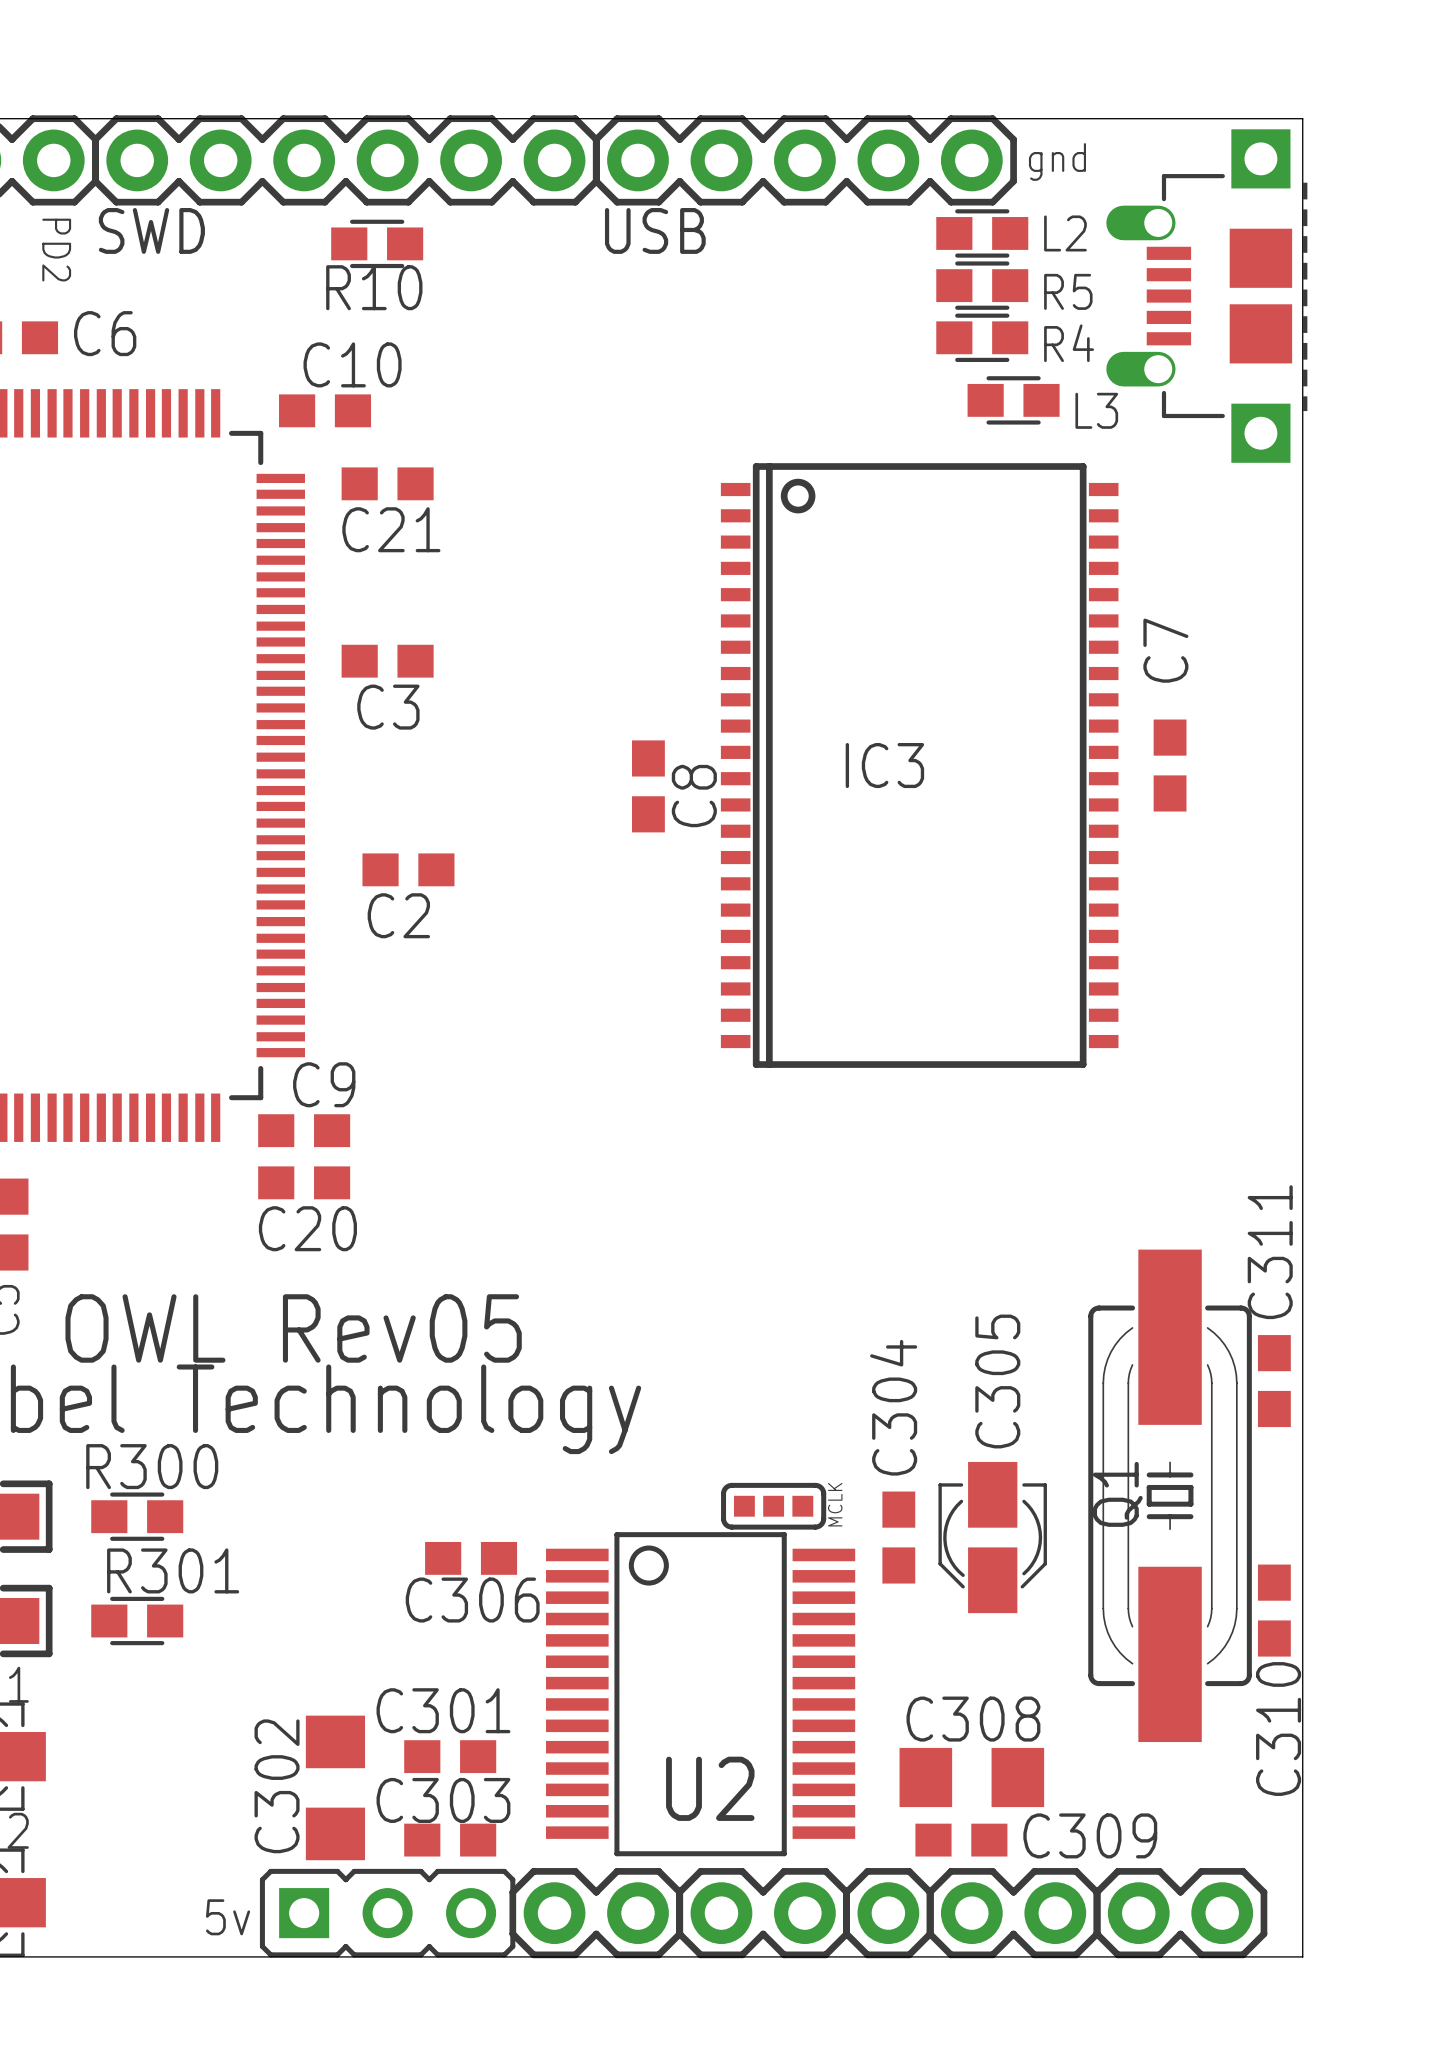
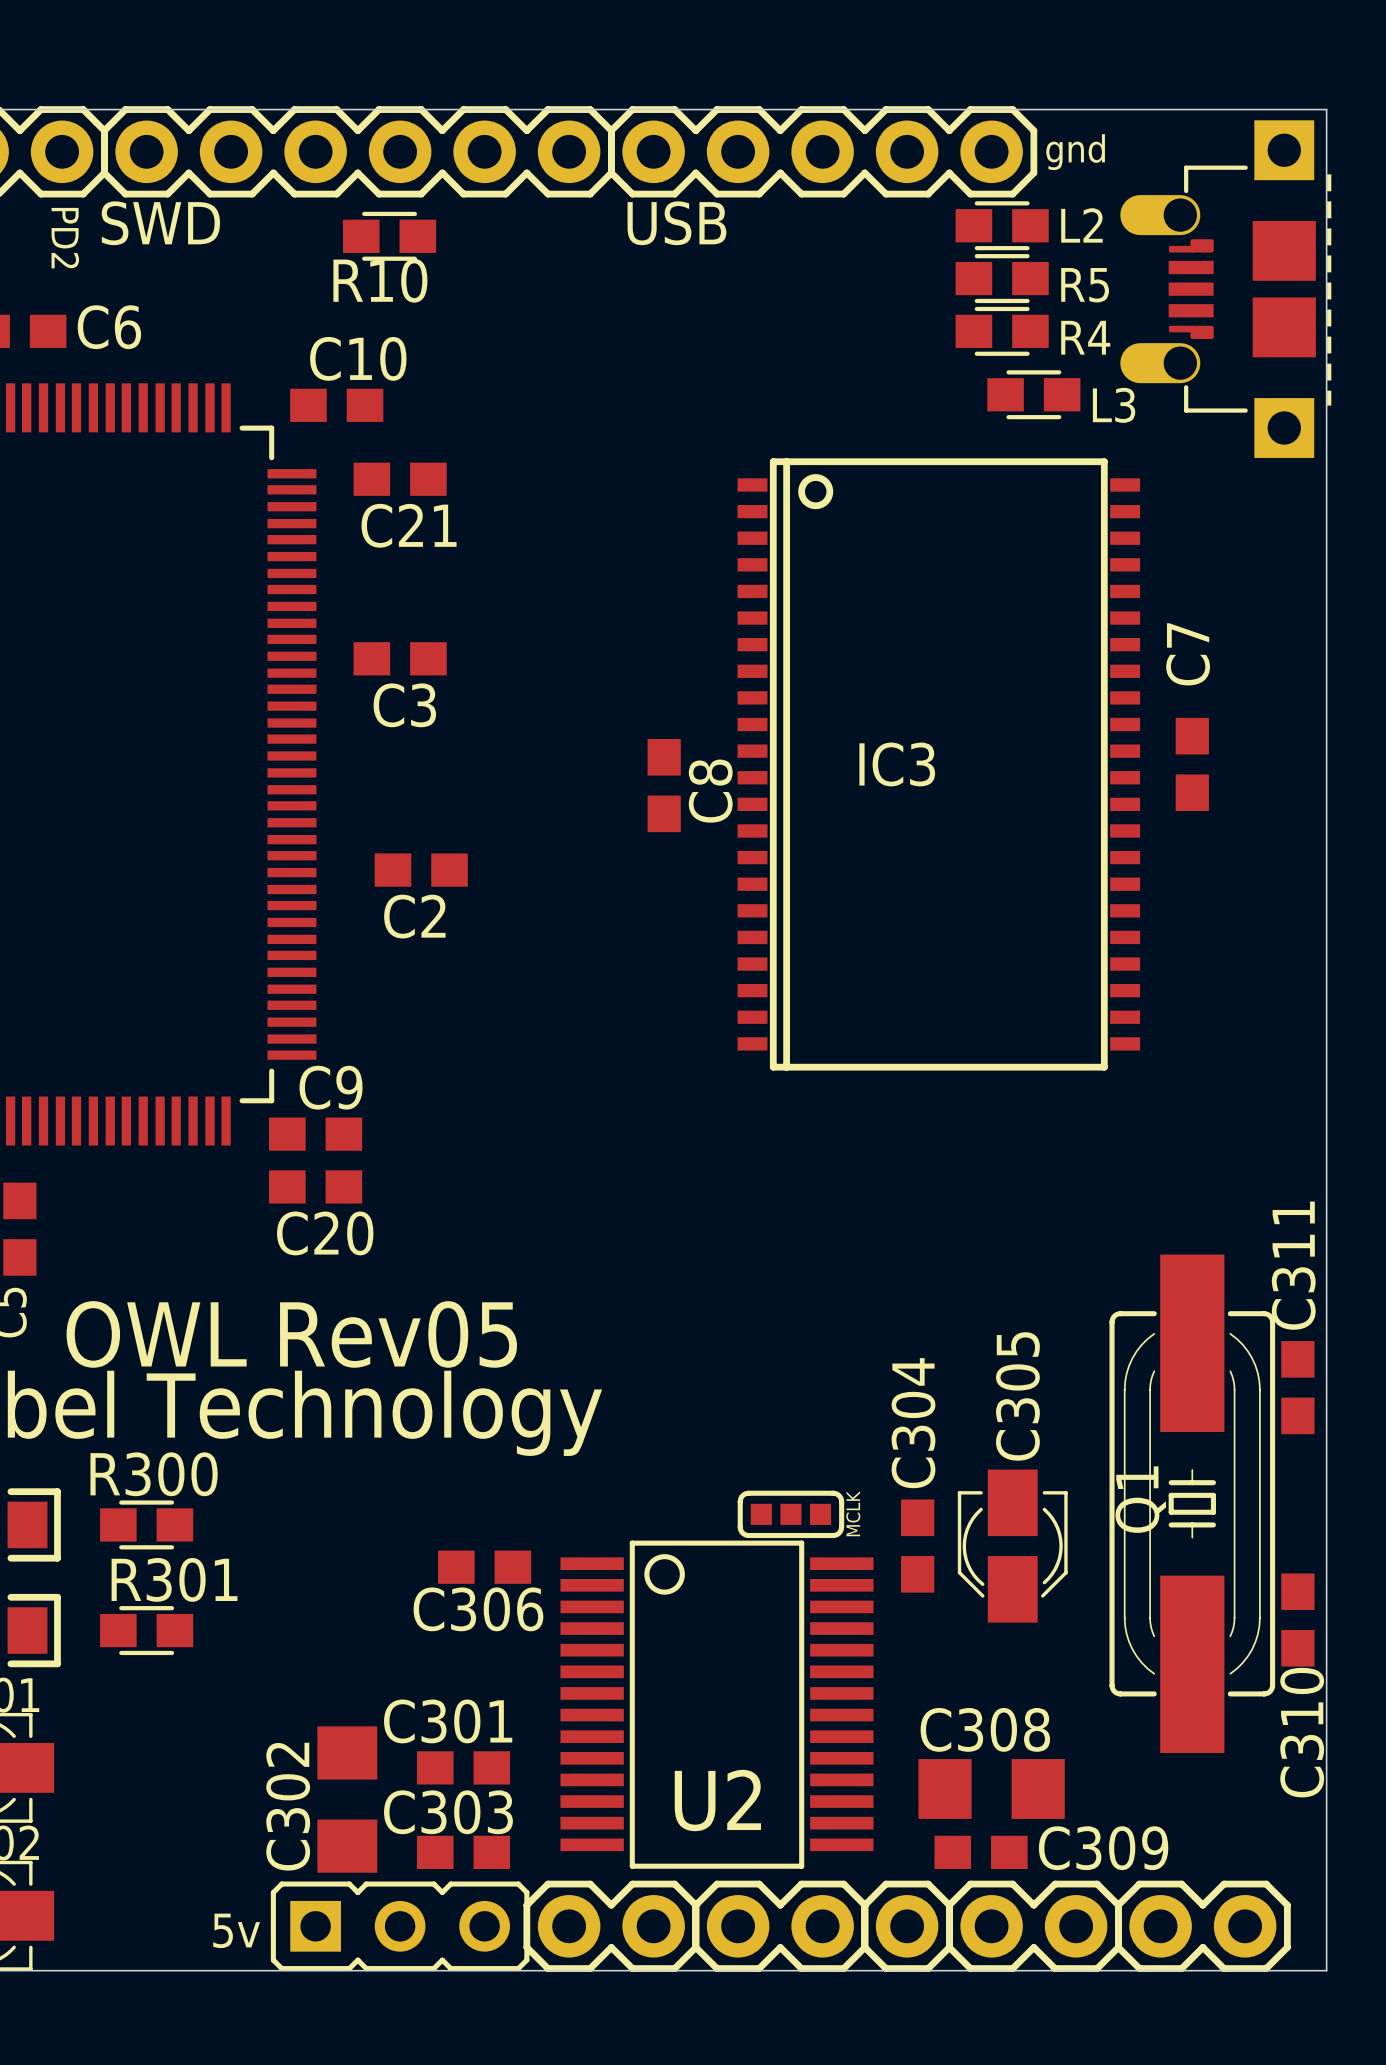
part footprint: [1106, 129, 1308, 463] -> [1120, 120, 1332, 458]

